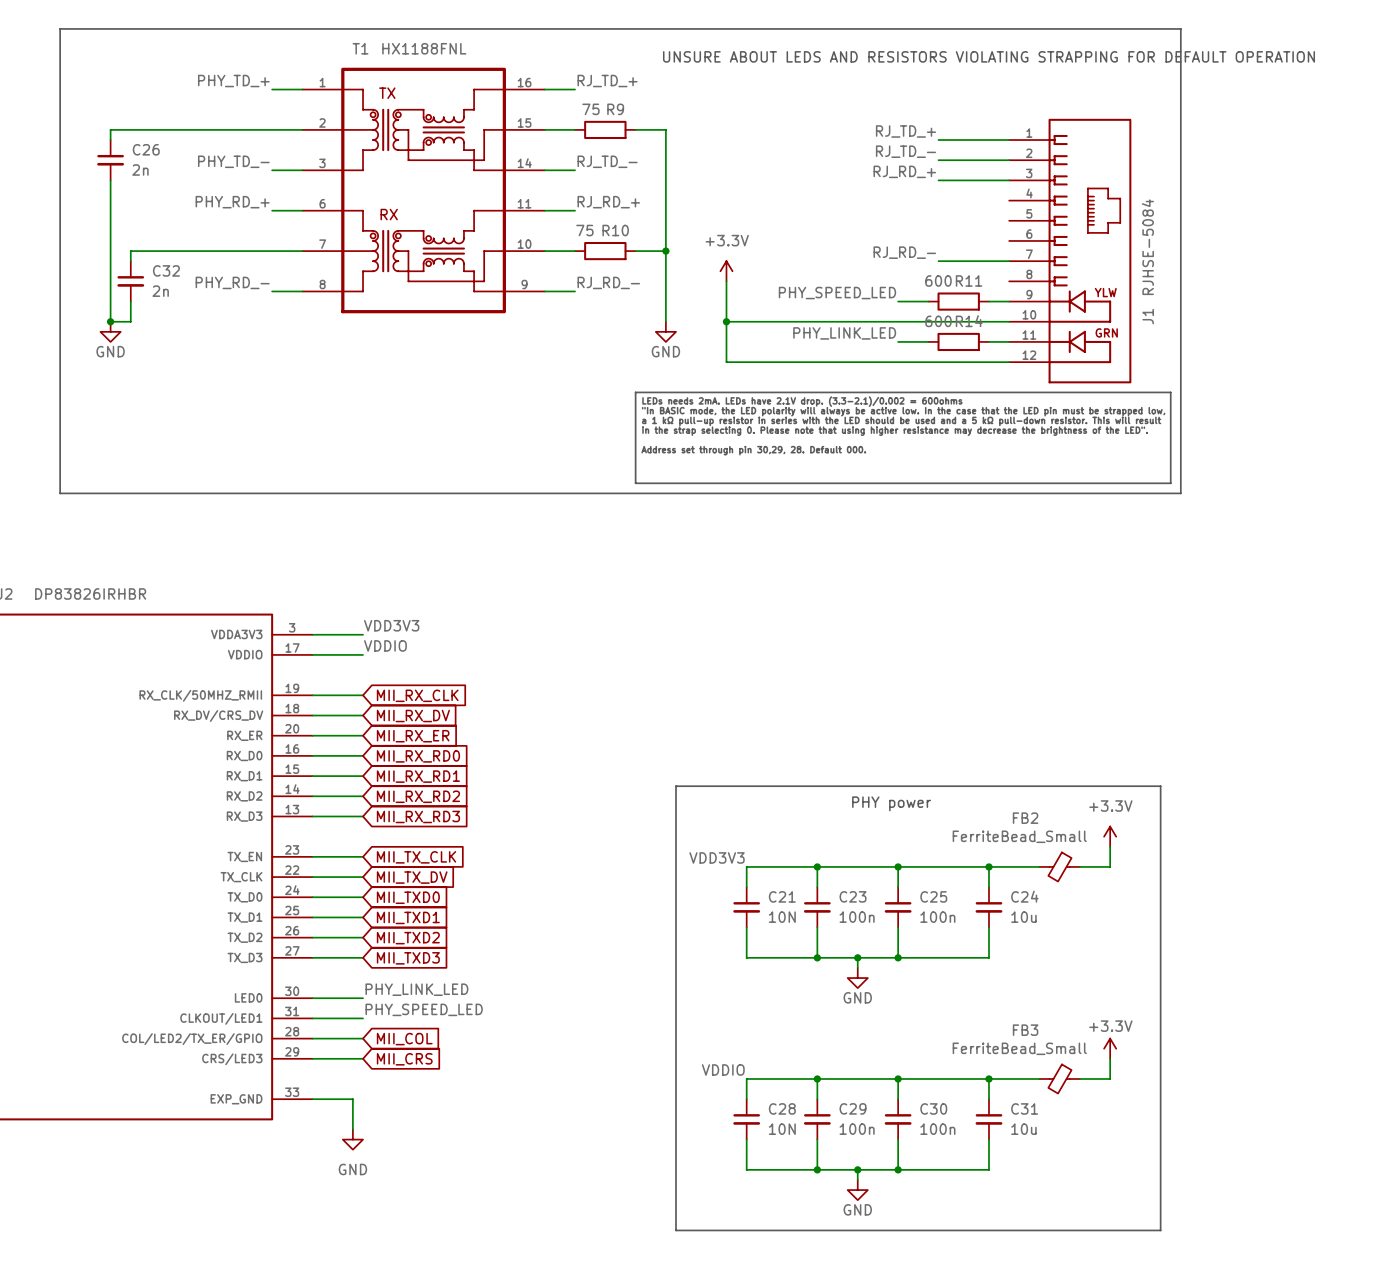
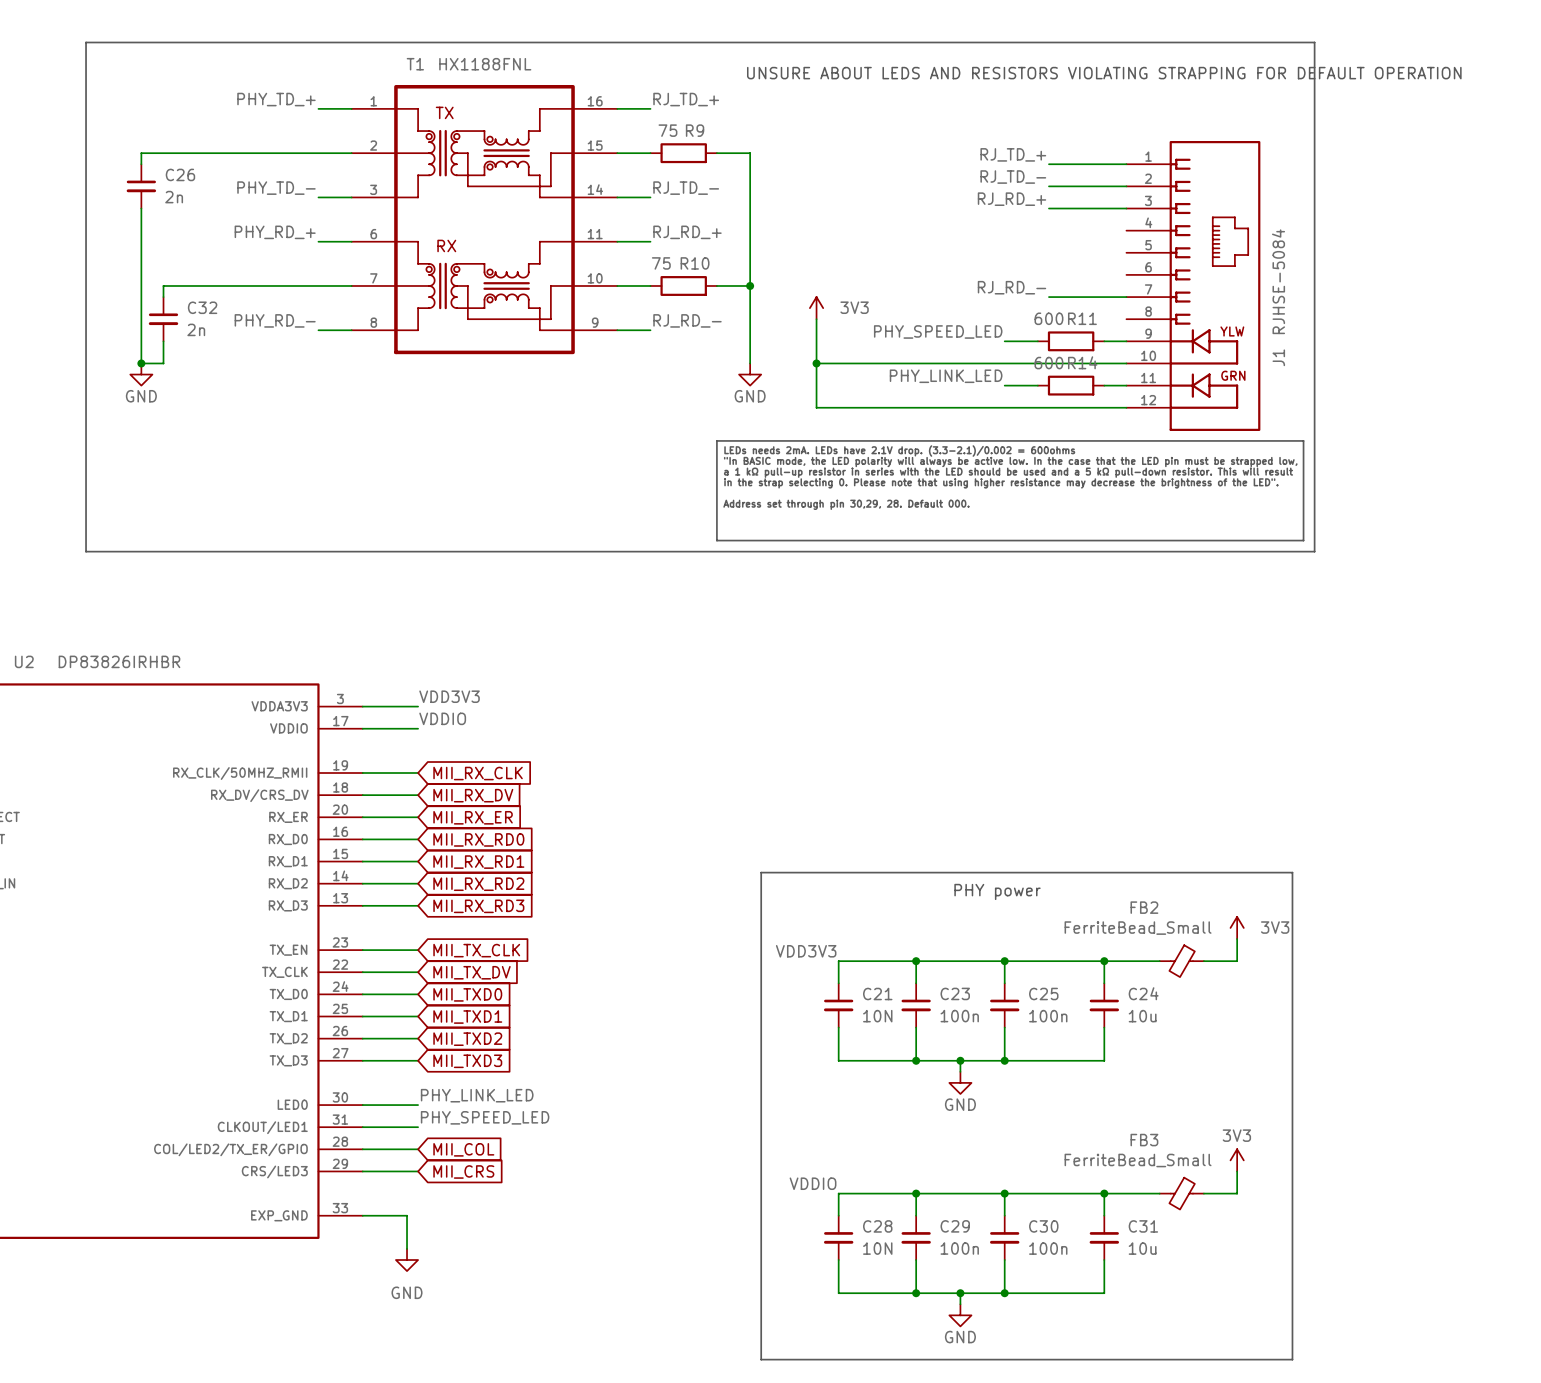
power symbol: +3.3V (726, 271) -> 3V3 (816, 308)
power symbol: +3.3V (1110, 836) -> 3V3 (1237, 927)
power symbol: +3.3V (1110, 1048) -> 3V3 (1237, 1160)

